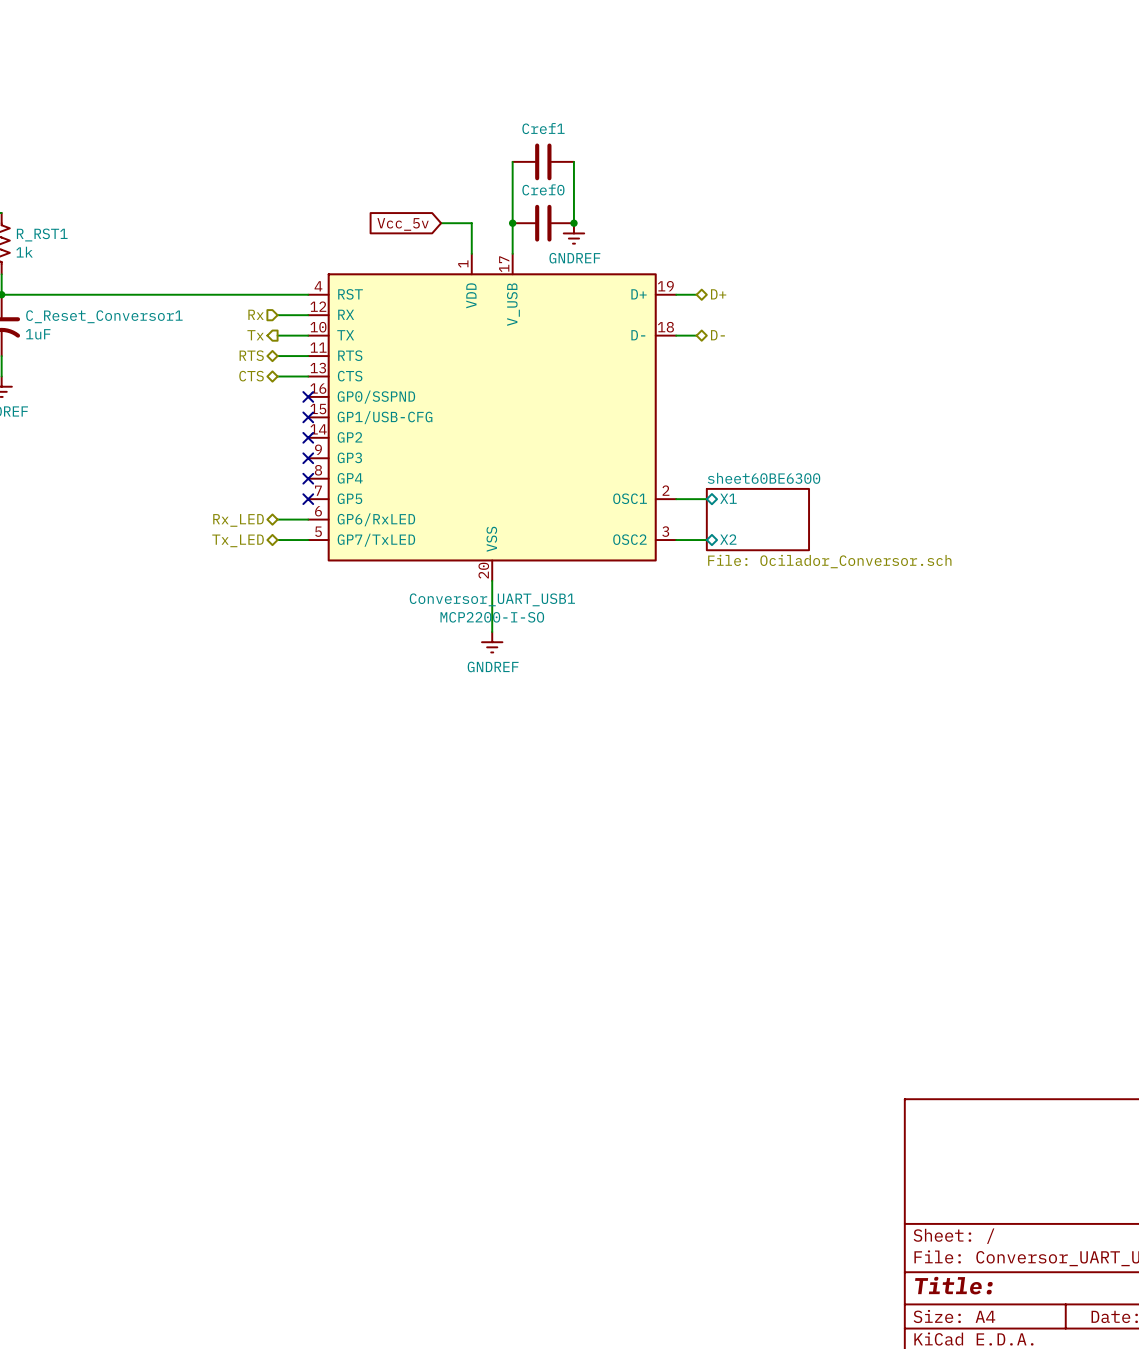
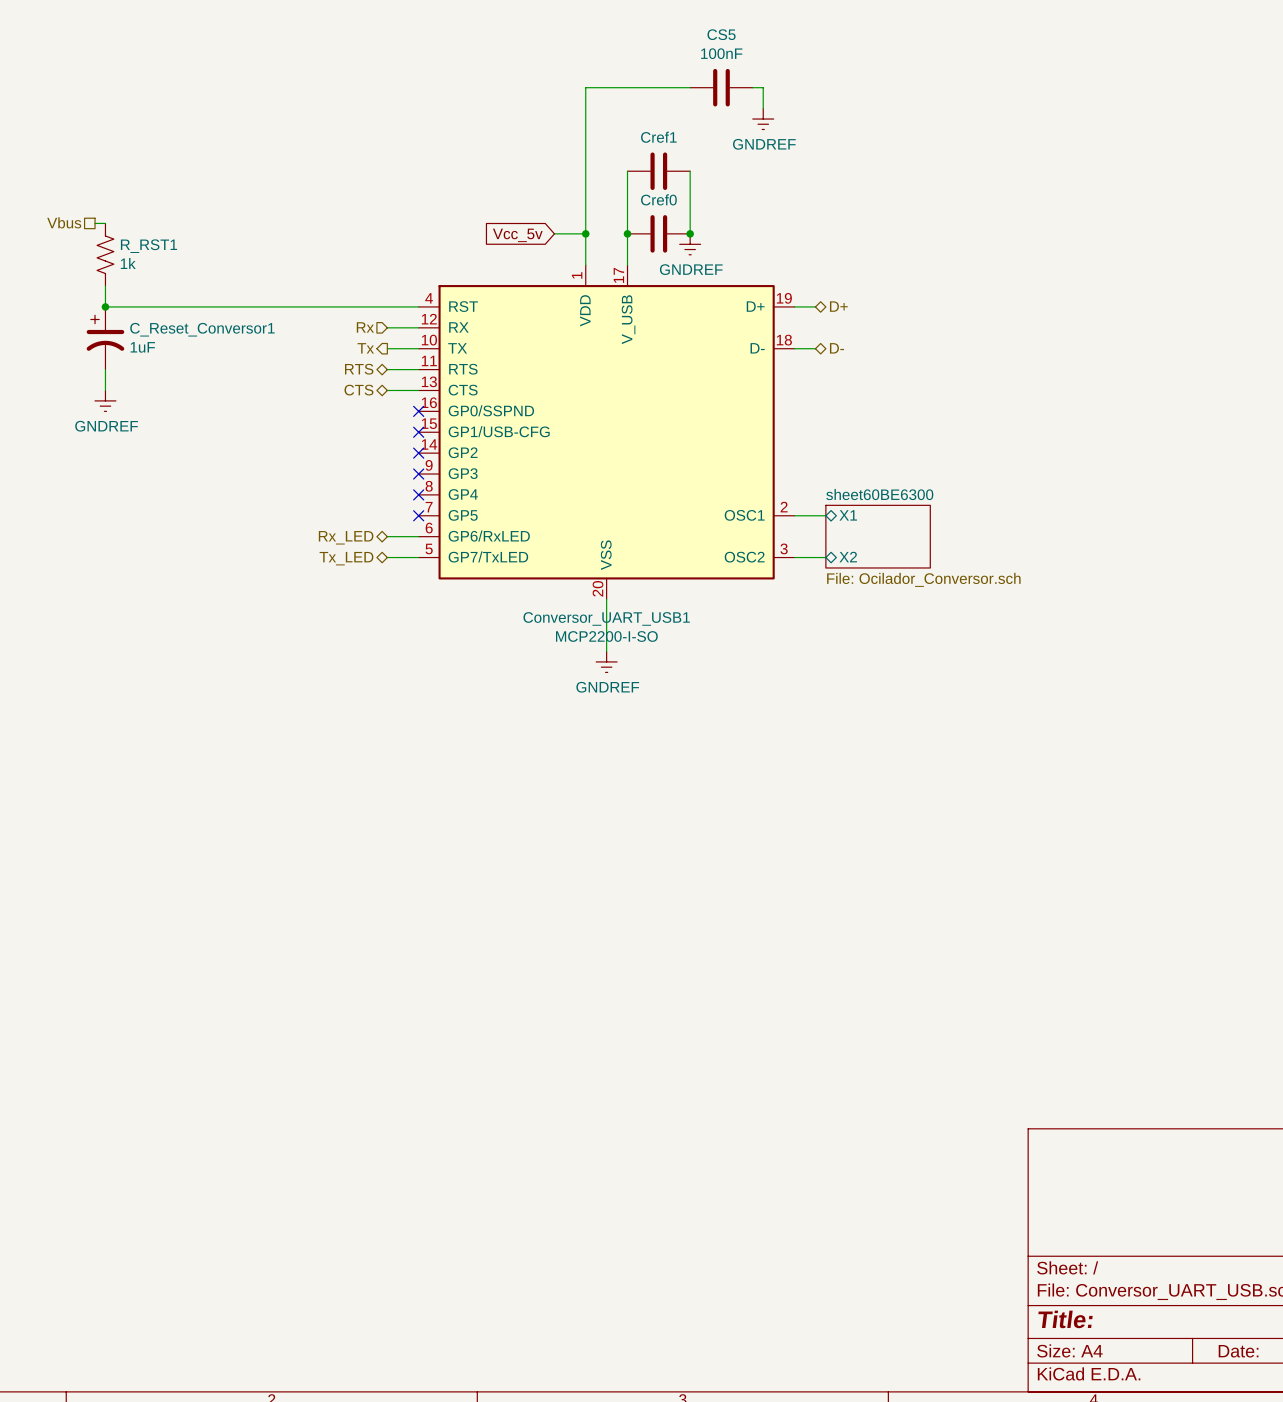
wire: none -> (690, 87) (585, 87) (585, 233)
CS5: none -> 100nF (721, 87)
wire: none -> (752, 87) (763, 87) (763, 108)
power symbol: none -> GNDREF (763, 119)
junction: none -> (585, 233)

